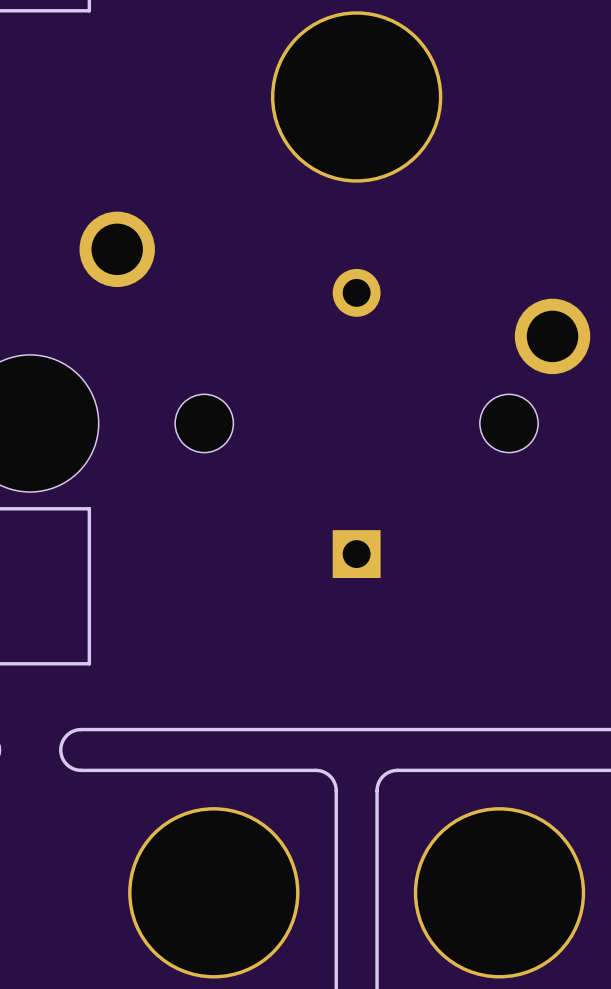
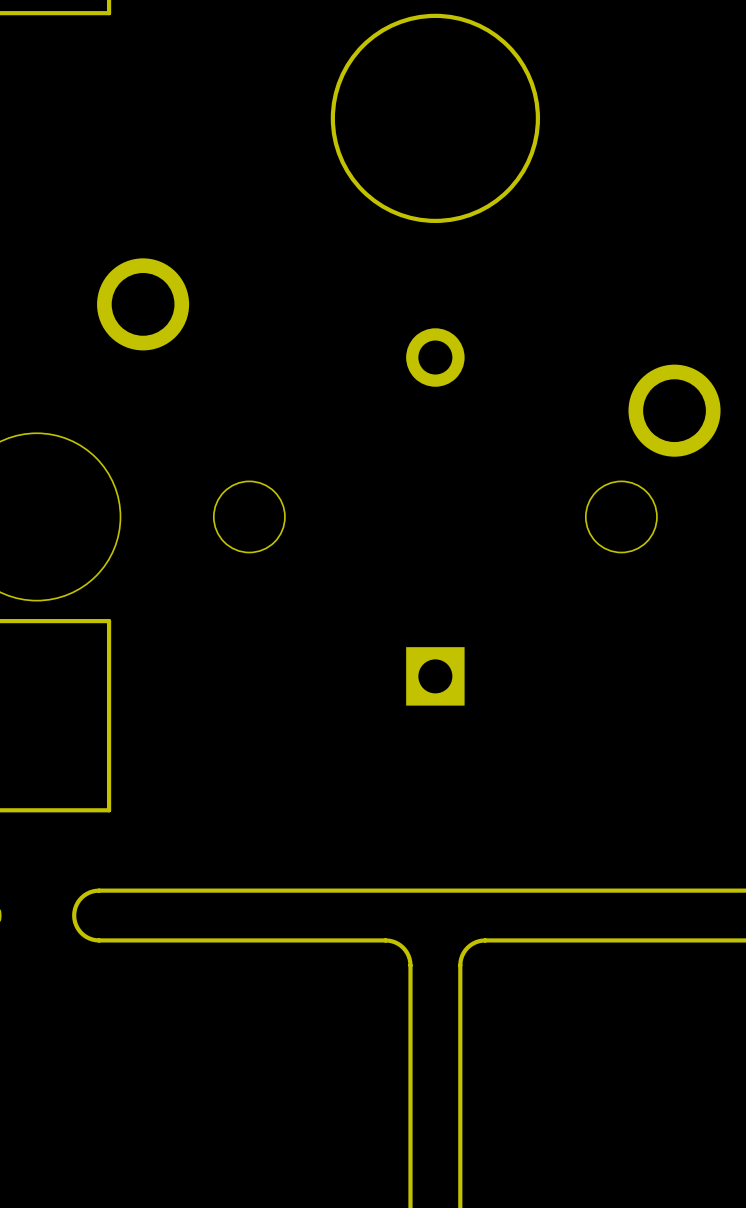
part: (213, 892) -> none
part: (499, 892) -> none

